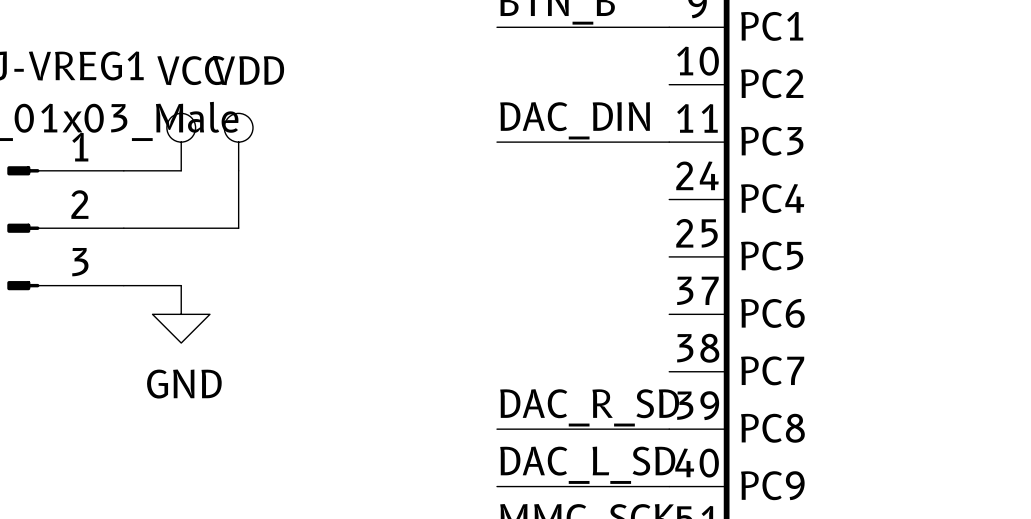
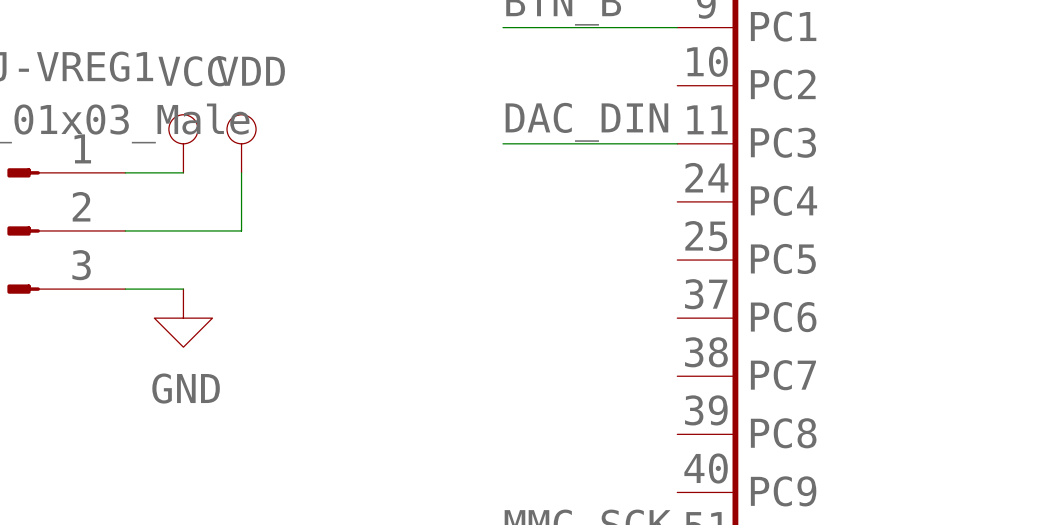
label: DAC_R_SD (589, 407) -> none
wire: (496, 429) (669, 429) -> none
label: DAC_L_SD (587, 465) -> none
wire: (496, 486) (669, 486) -> none

